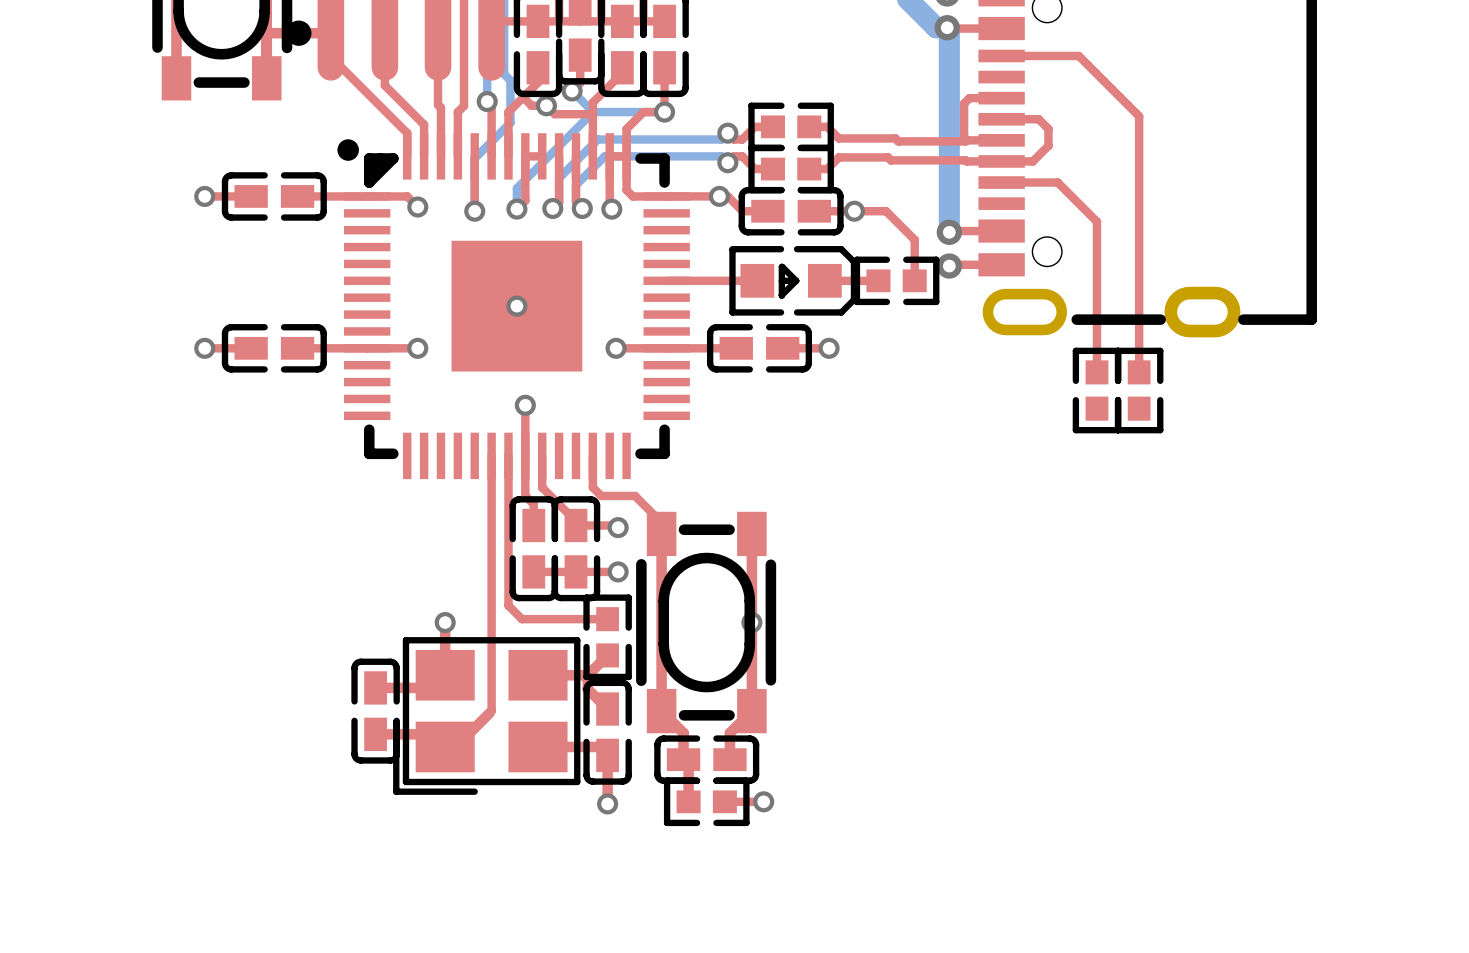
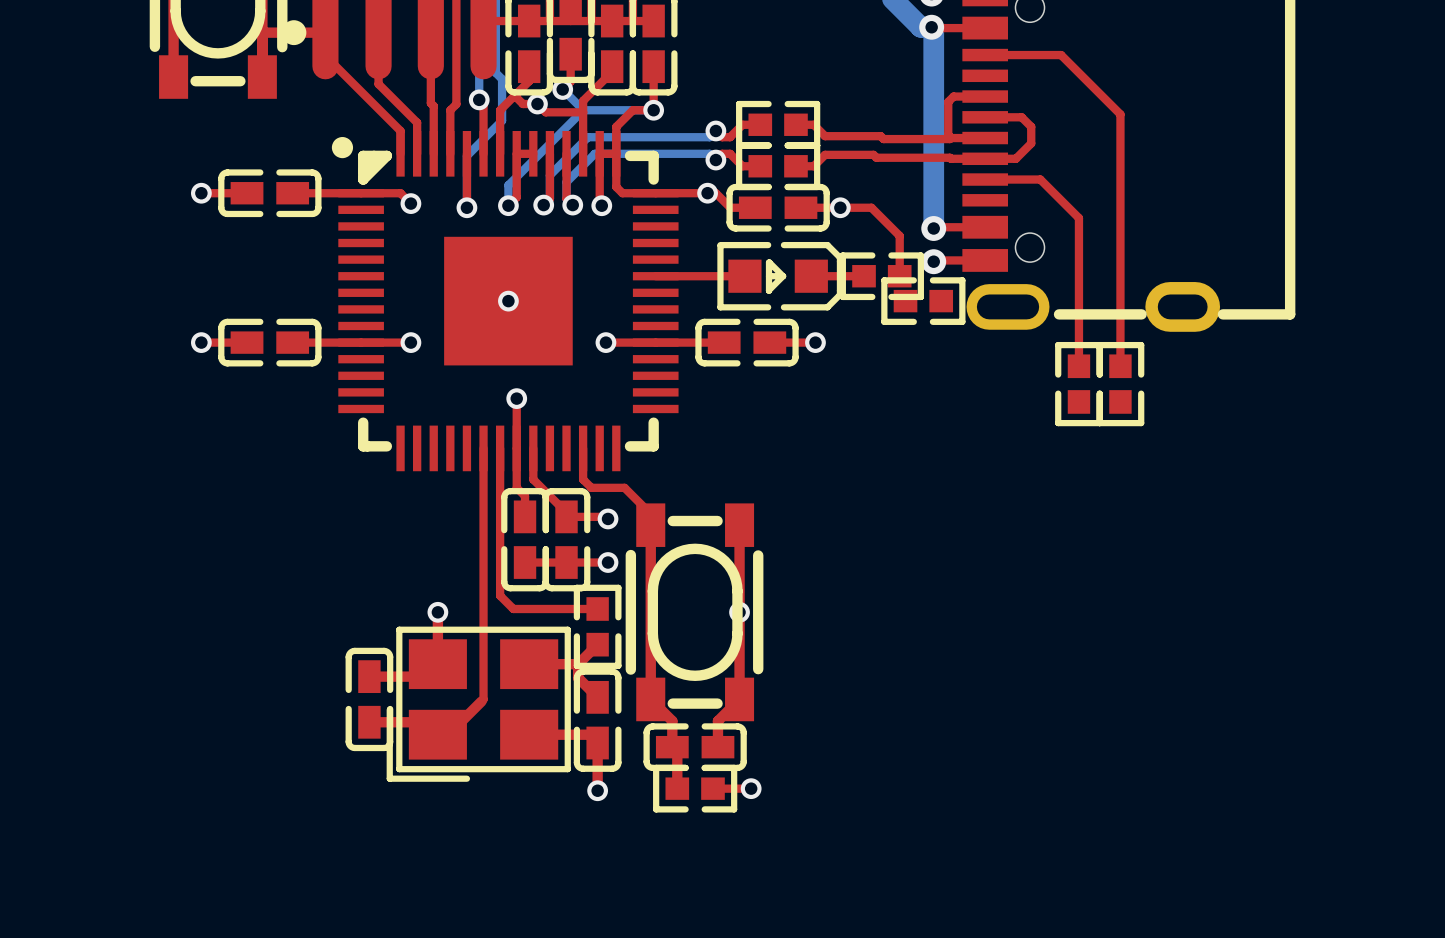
part: none -> (923, 301)

